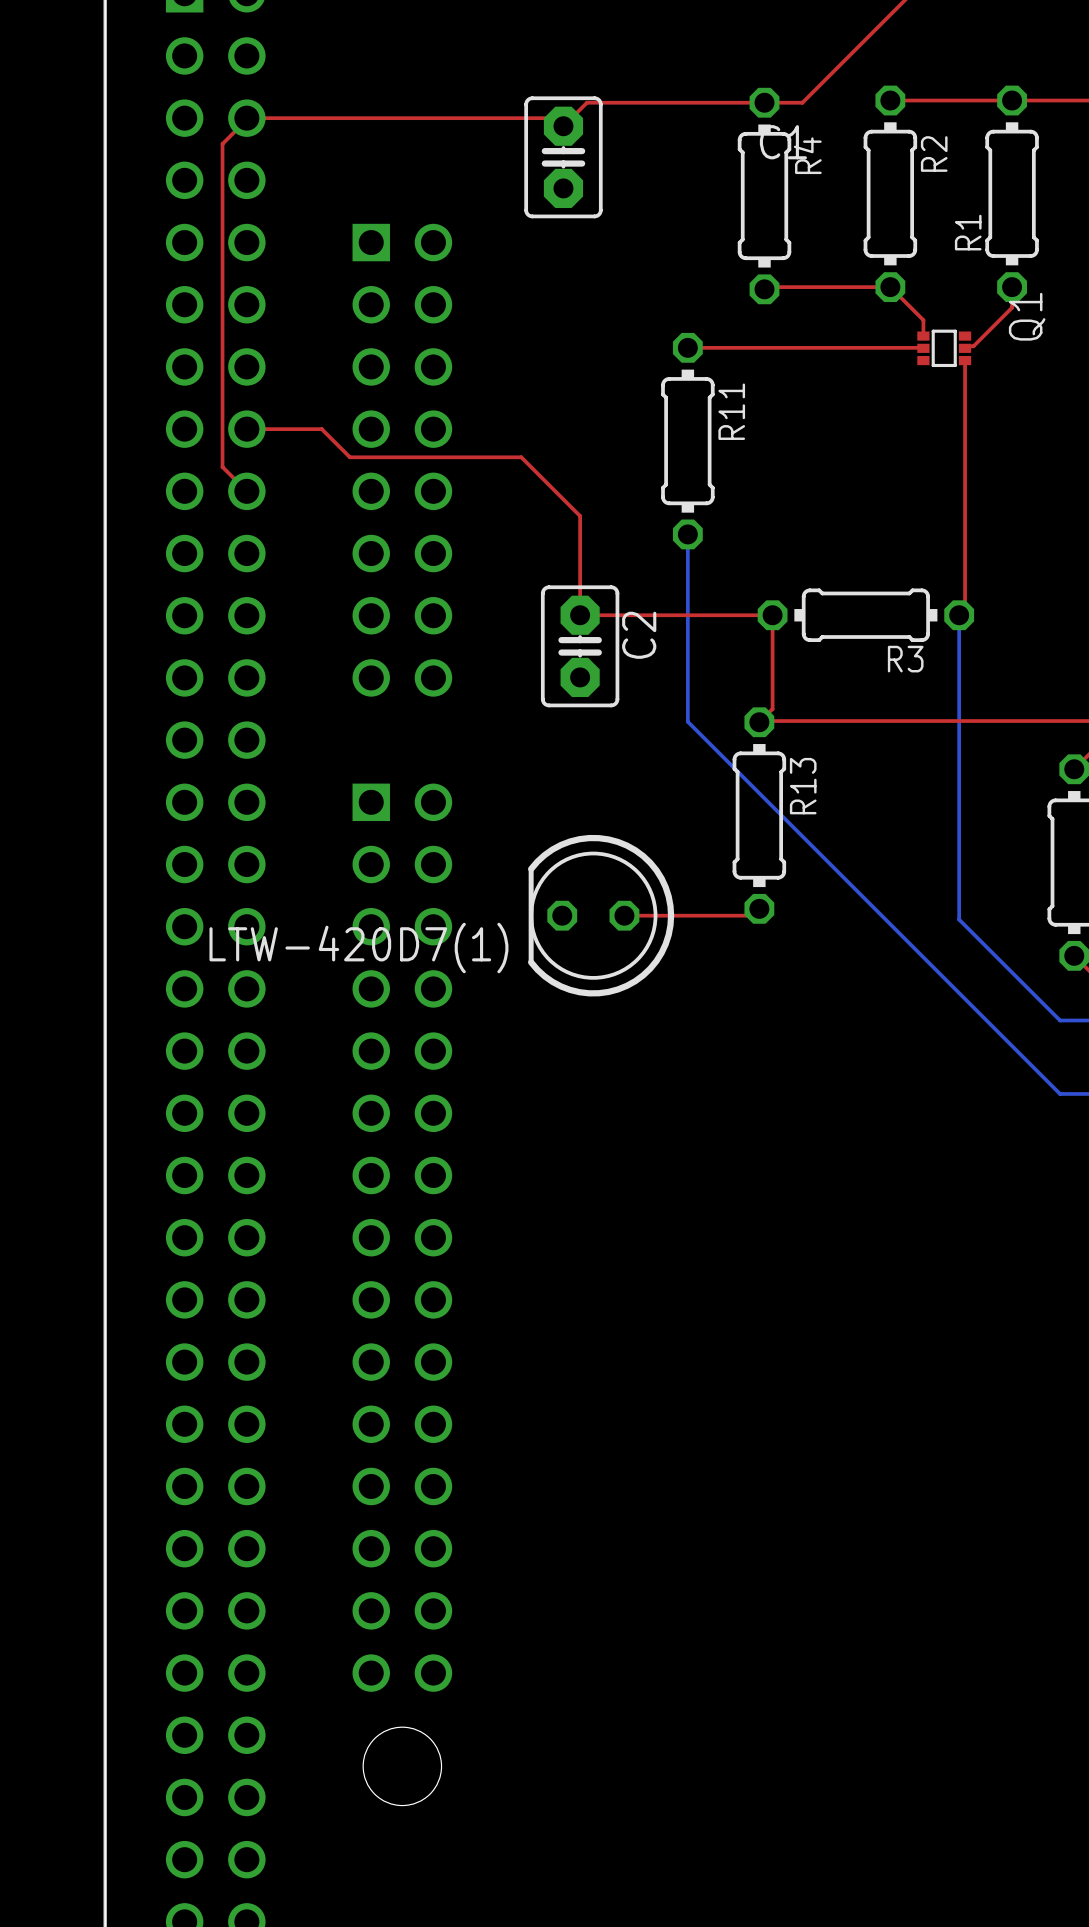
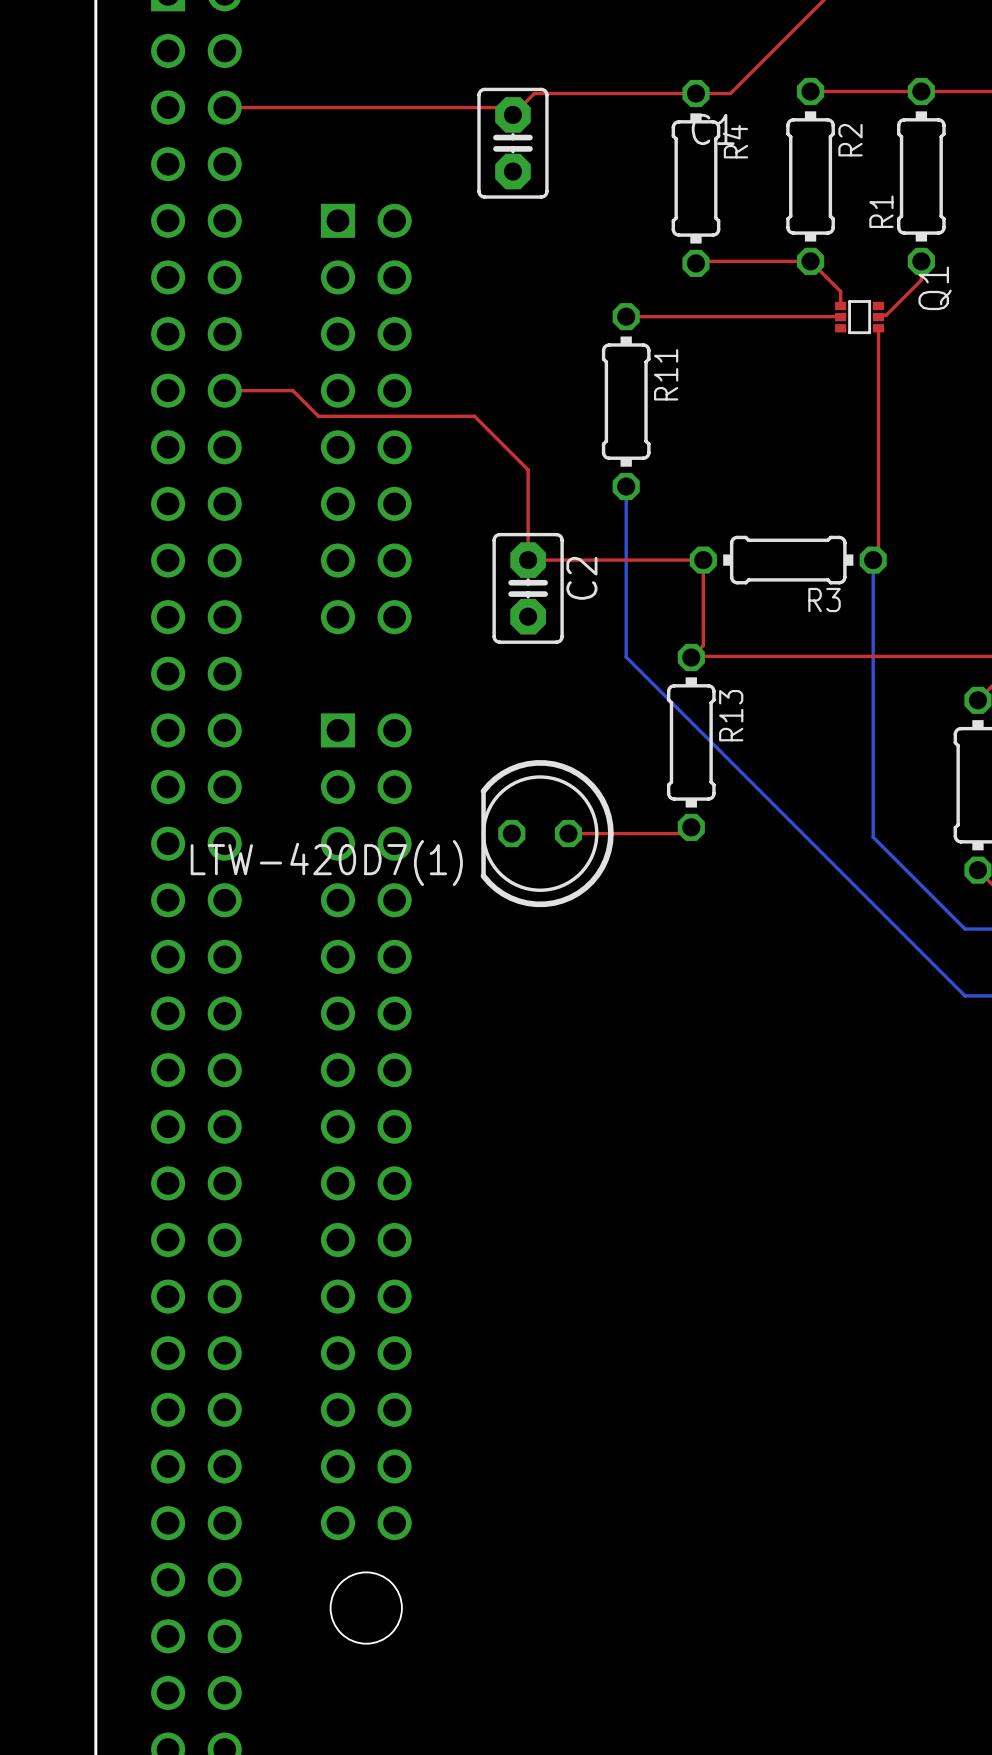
top track: (246, 118) (222, 143) (222, 467) (246, 491) -> none

